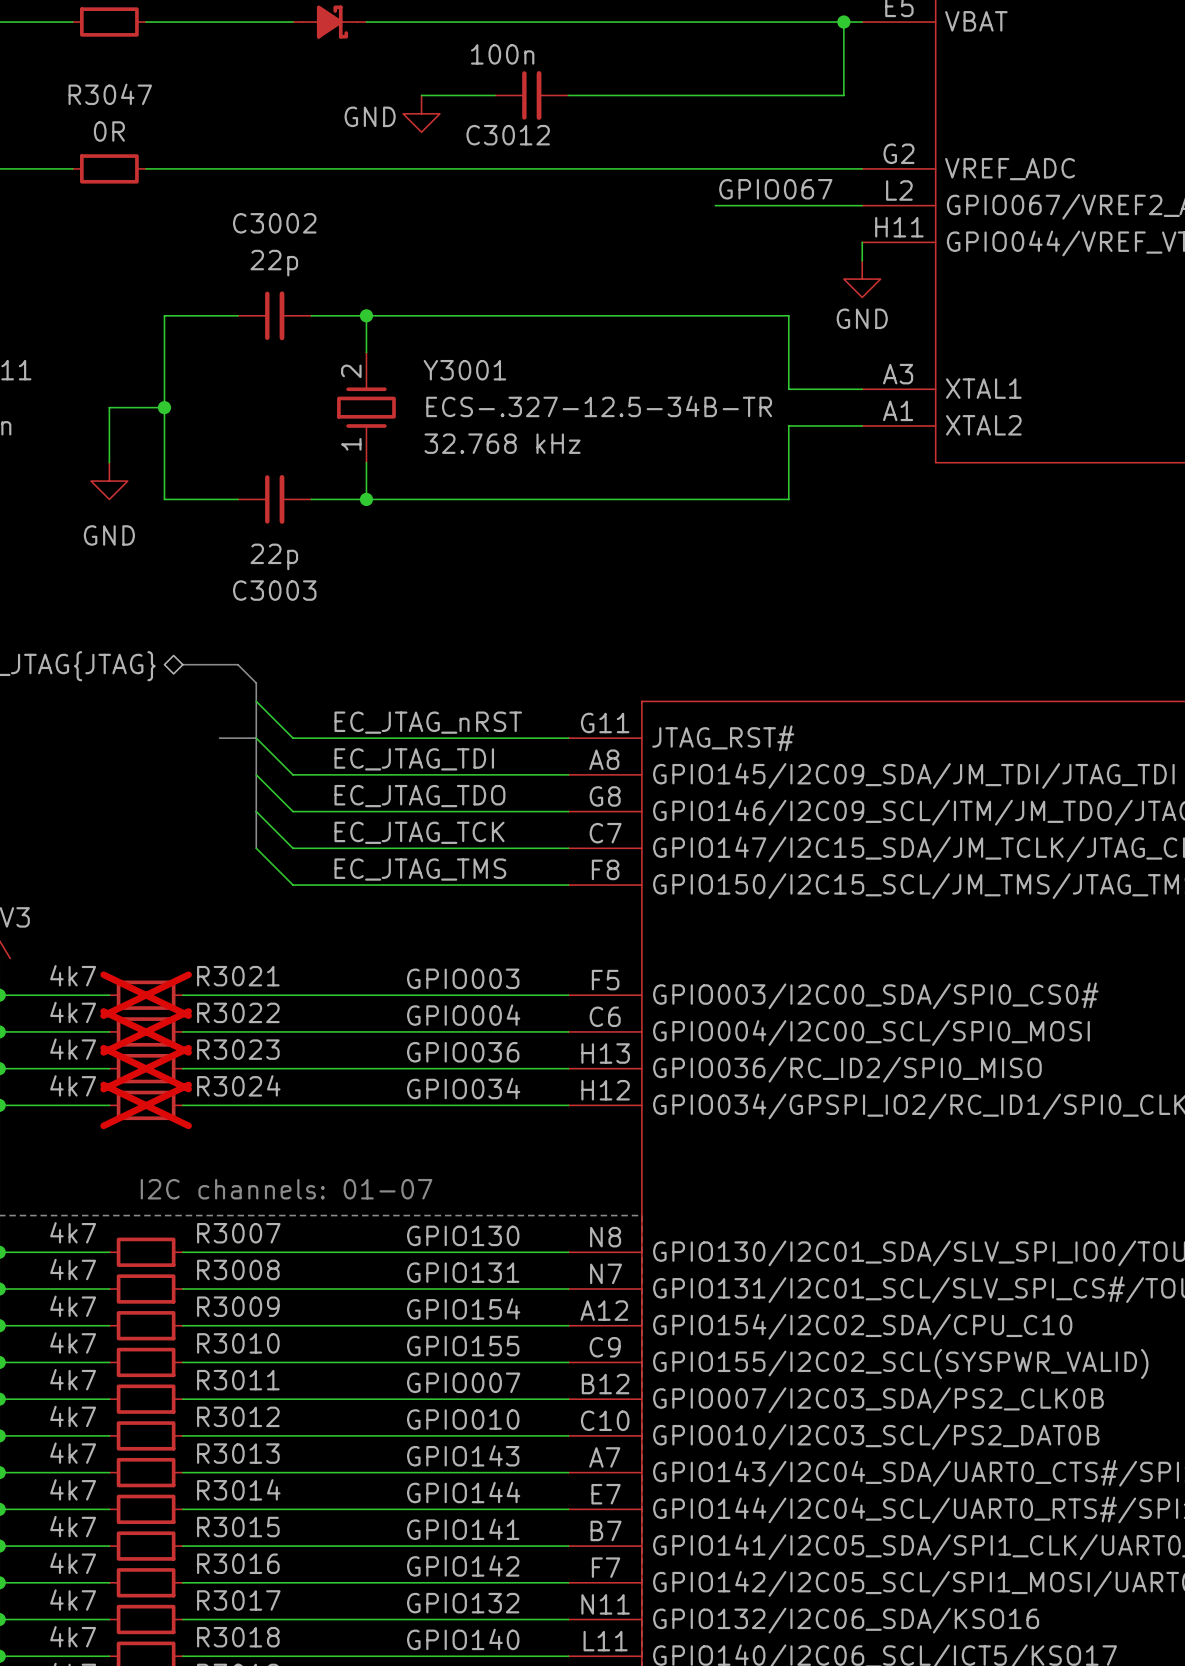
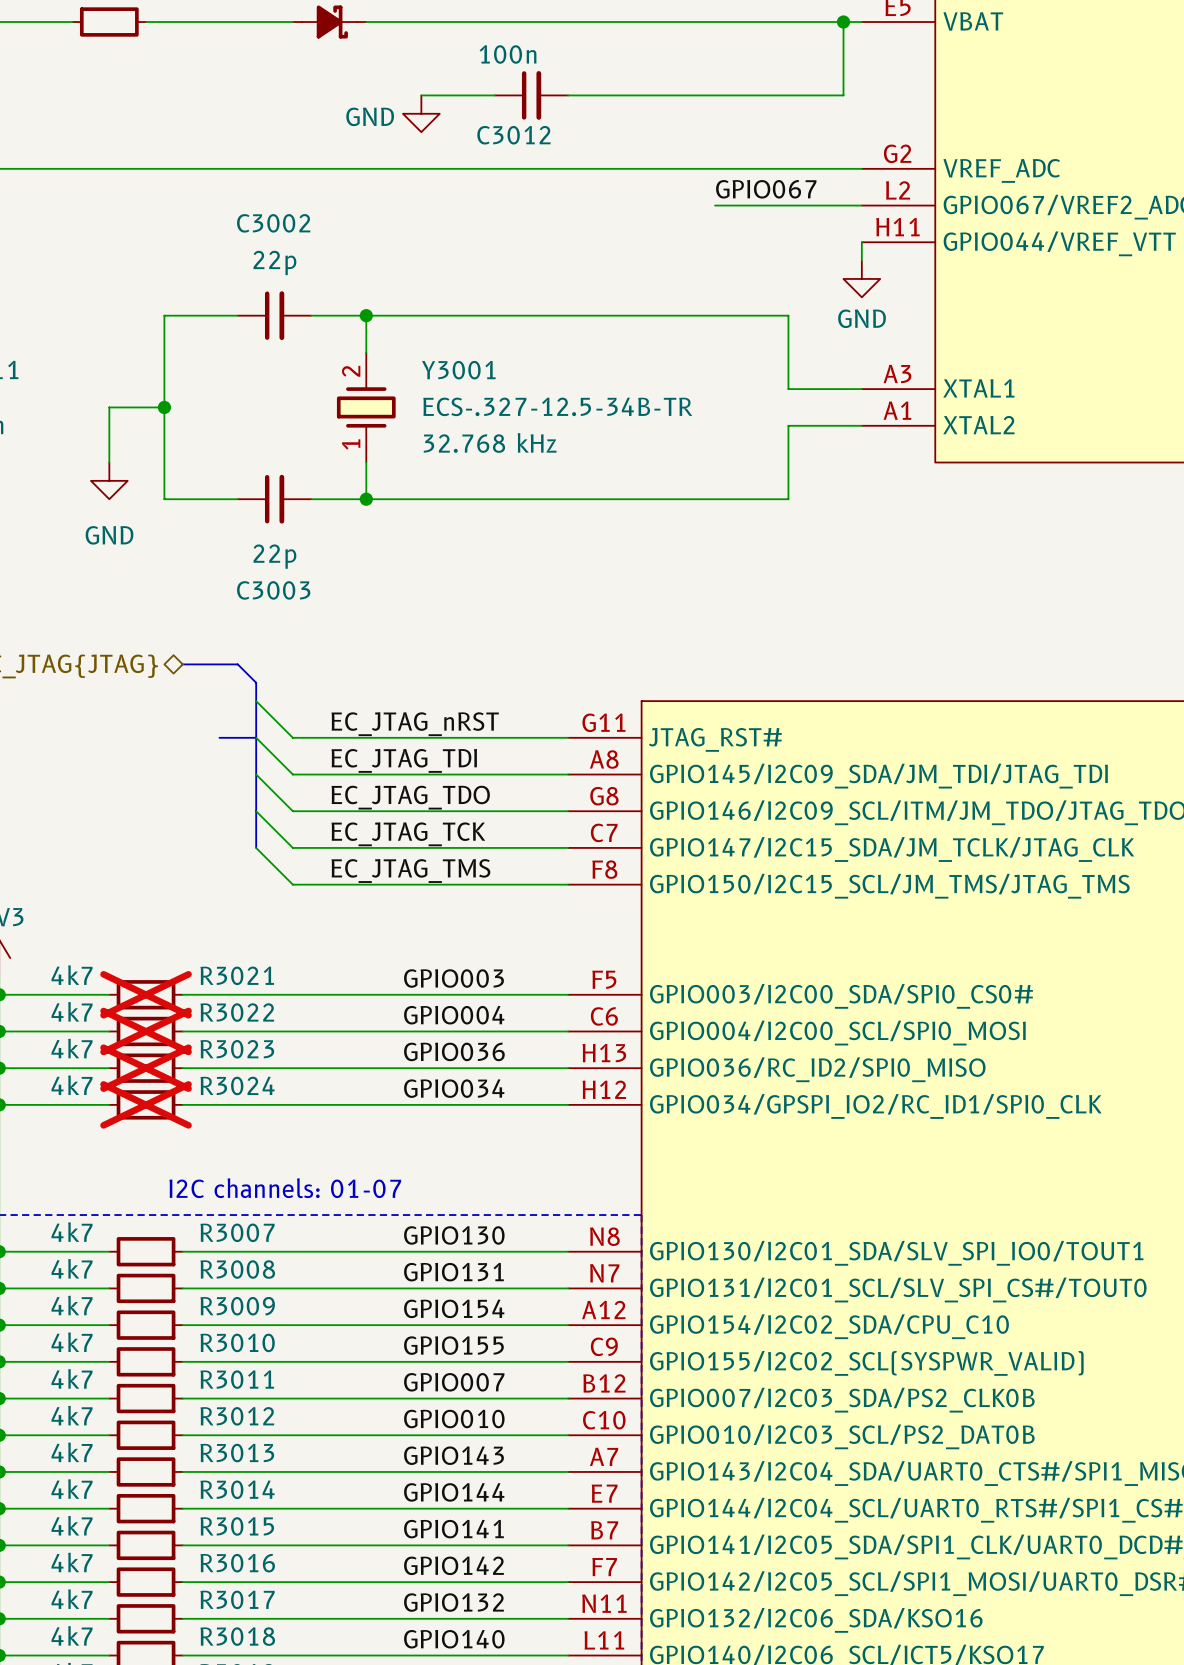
wire: none -> (72, 168) (146, 168)
R3047: (109, 168) -> none

